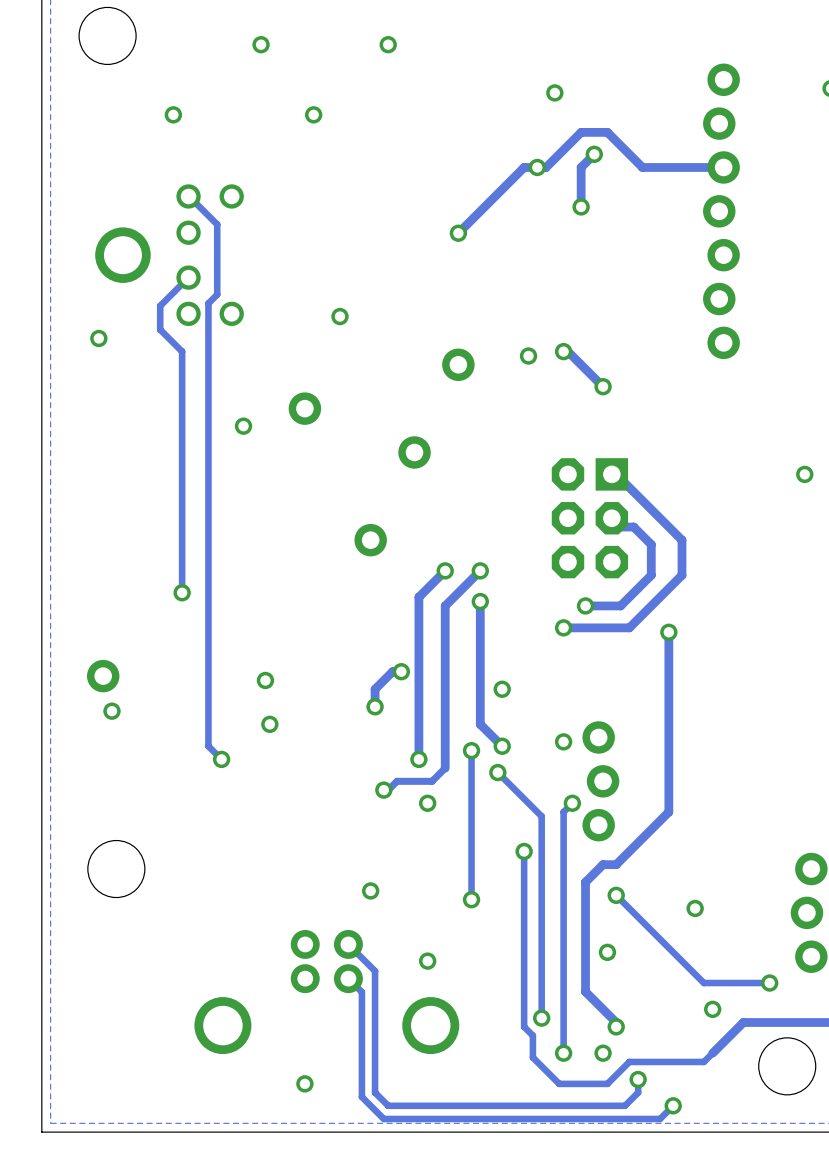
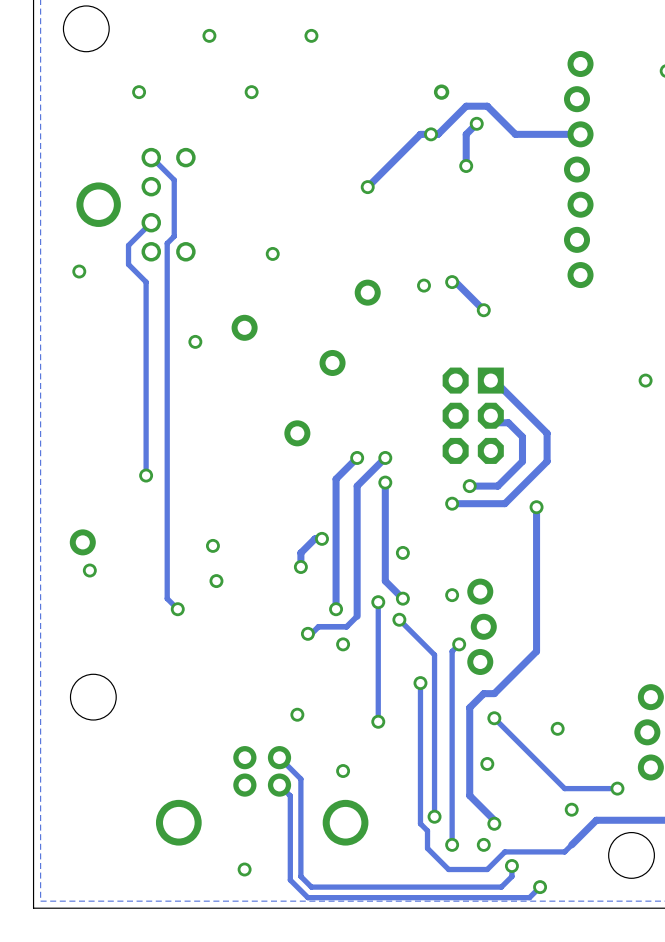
via: (554, 92) -> none
via: none -> (441, 92)

